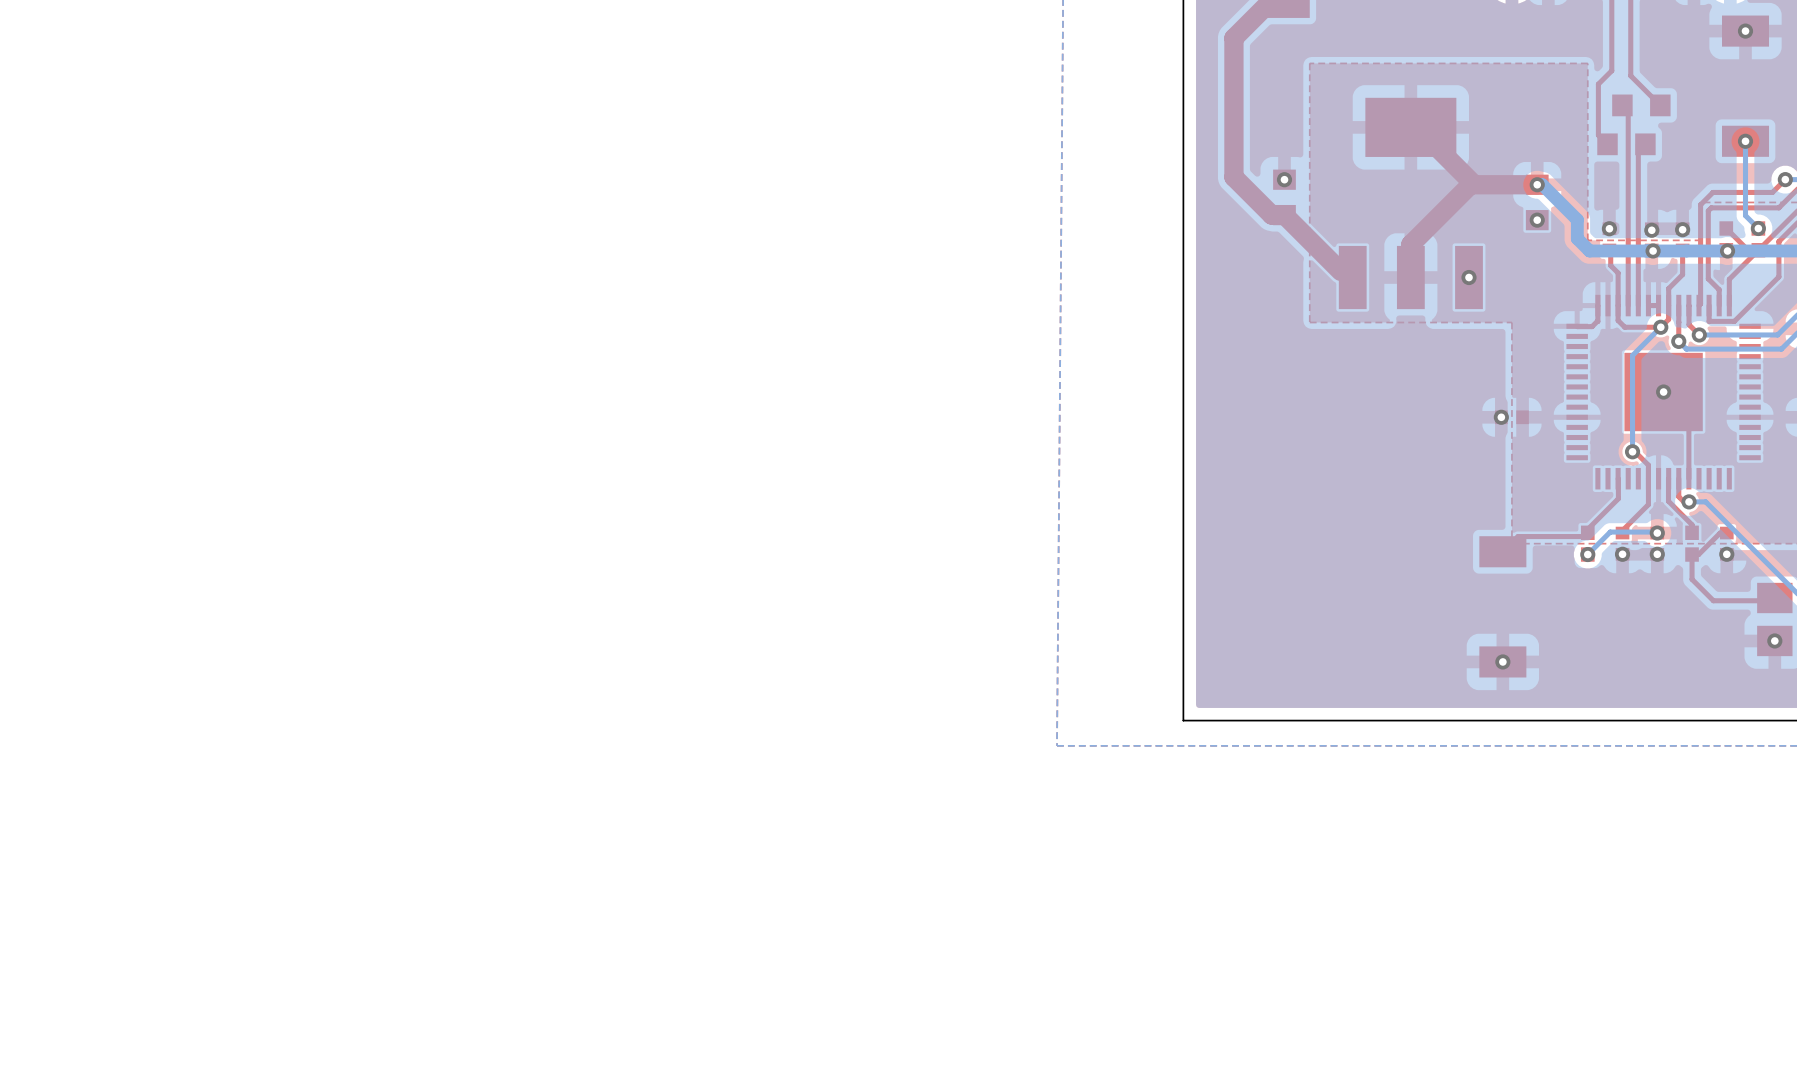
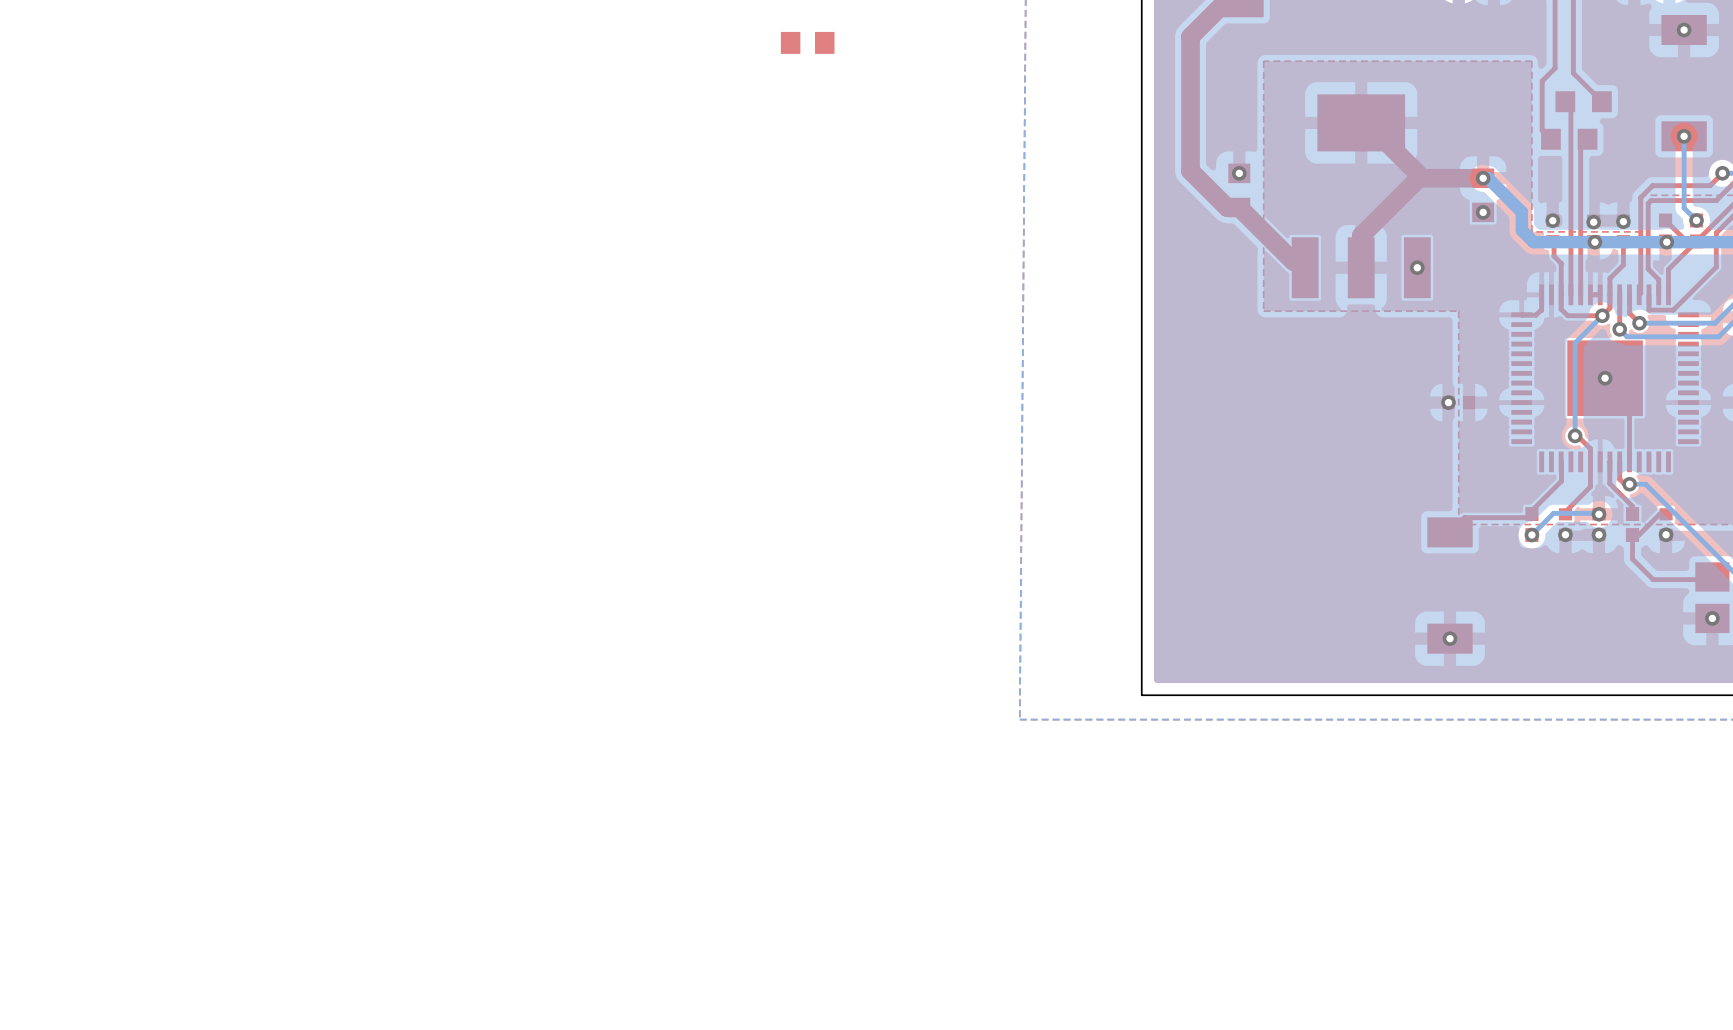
part: none -> (807, 42)

